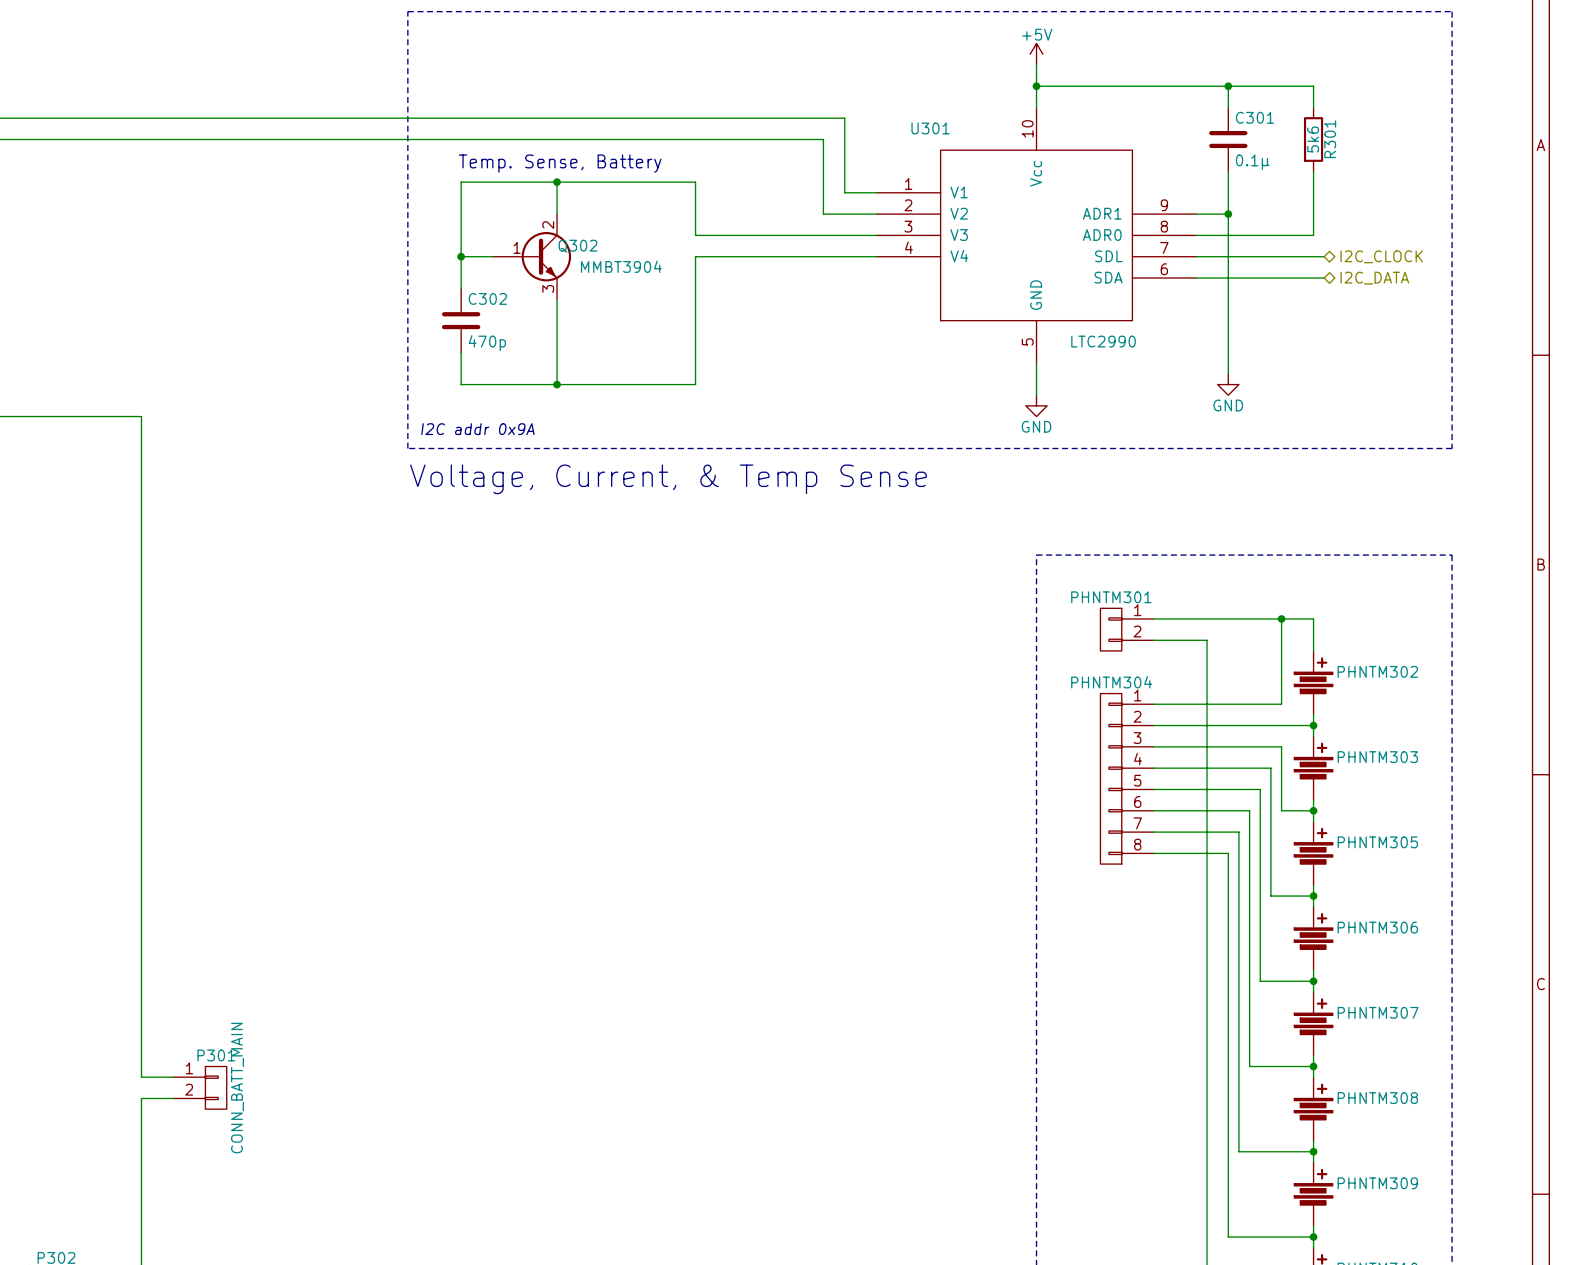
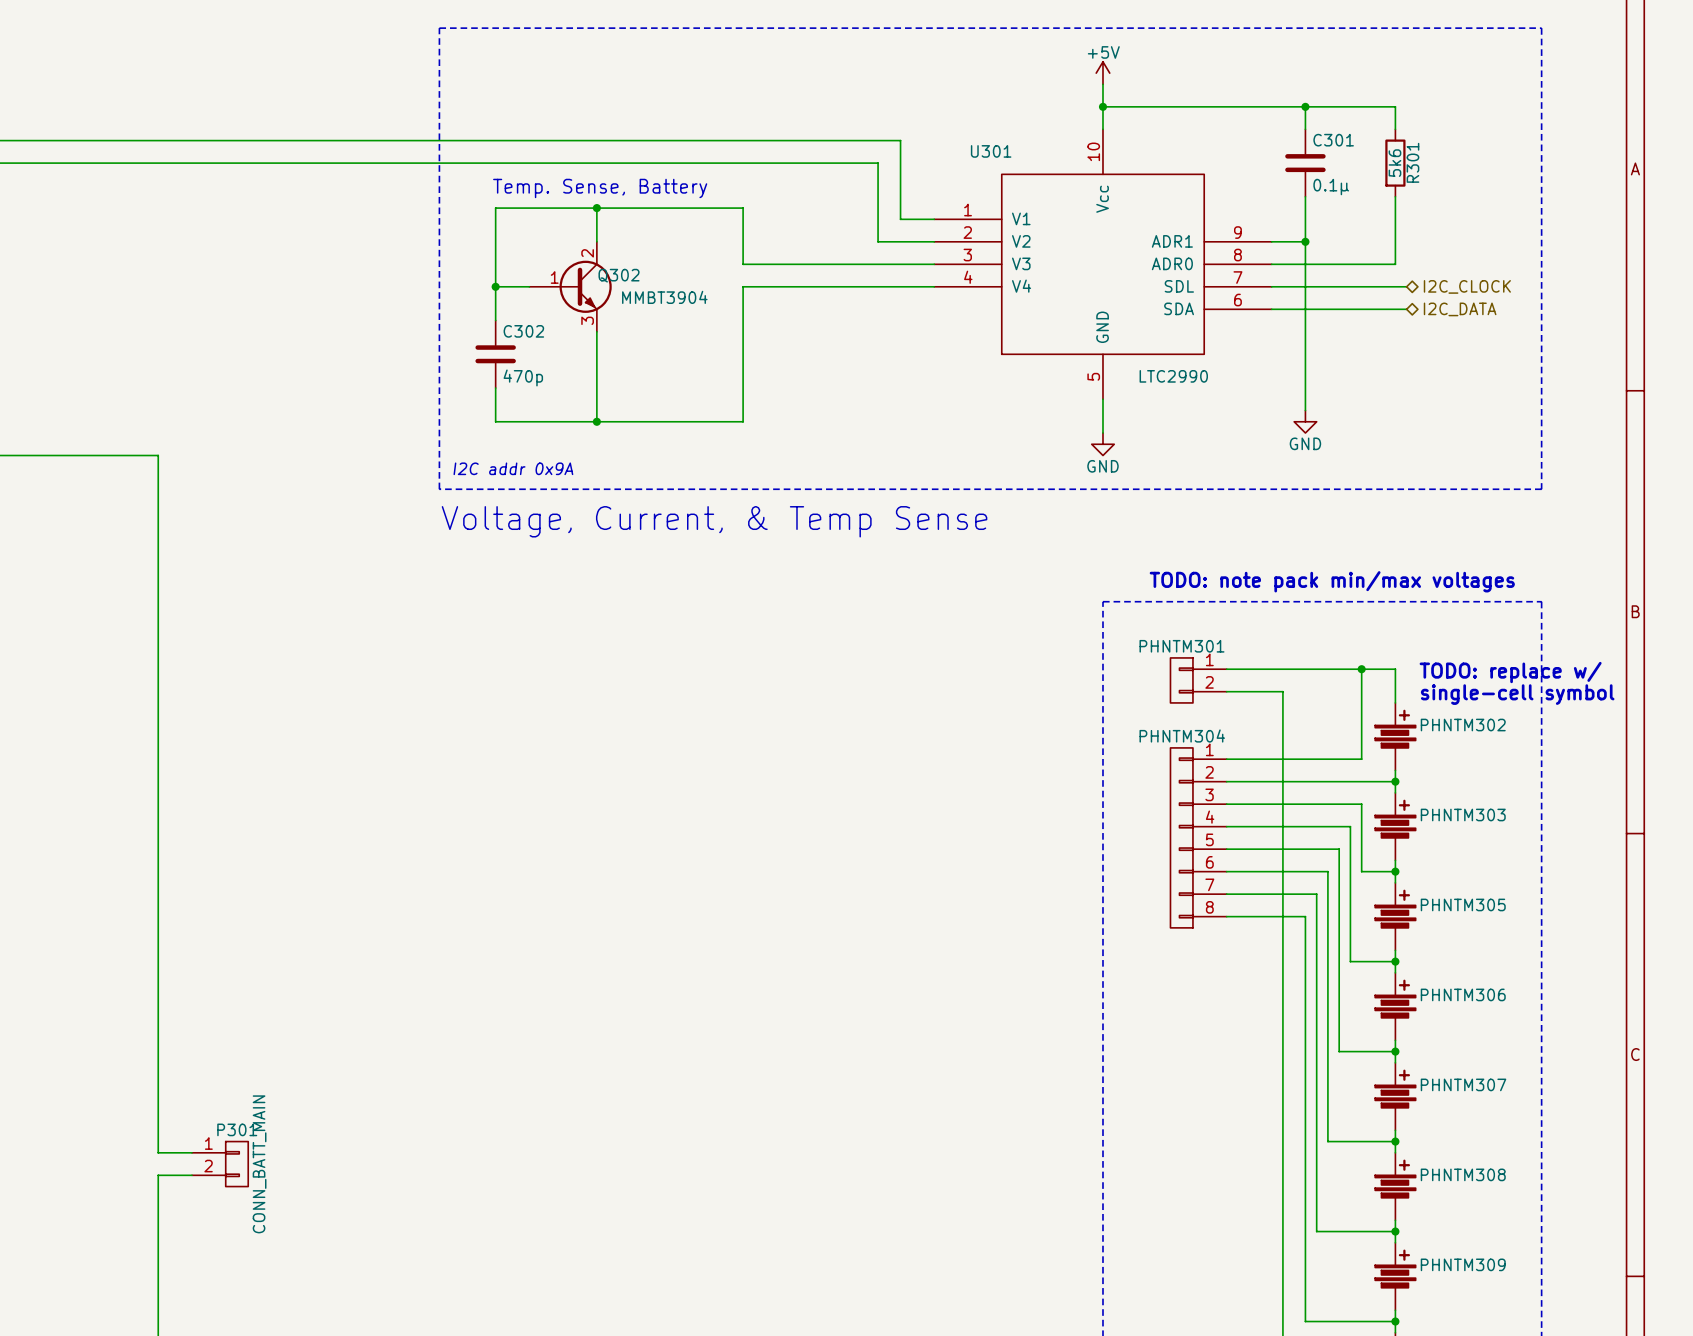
text: none -> TODO: note pack min/max voltages (1332, 581)
text: none -> TODO: replace w/ (1510, 672)
text: none -> single-cell symbol (1517, 694)

